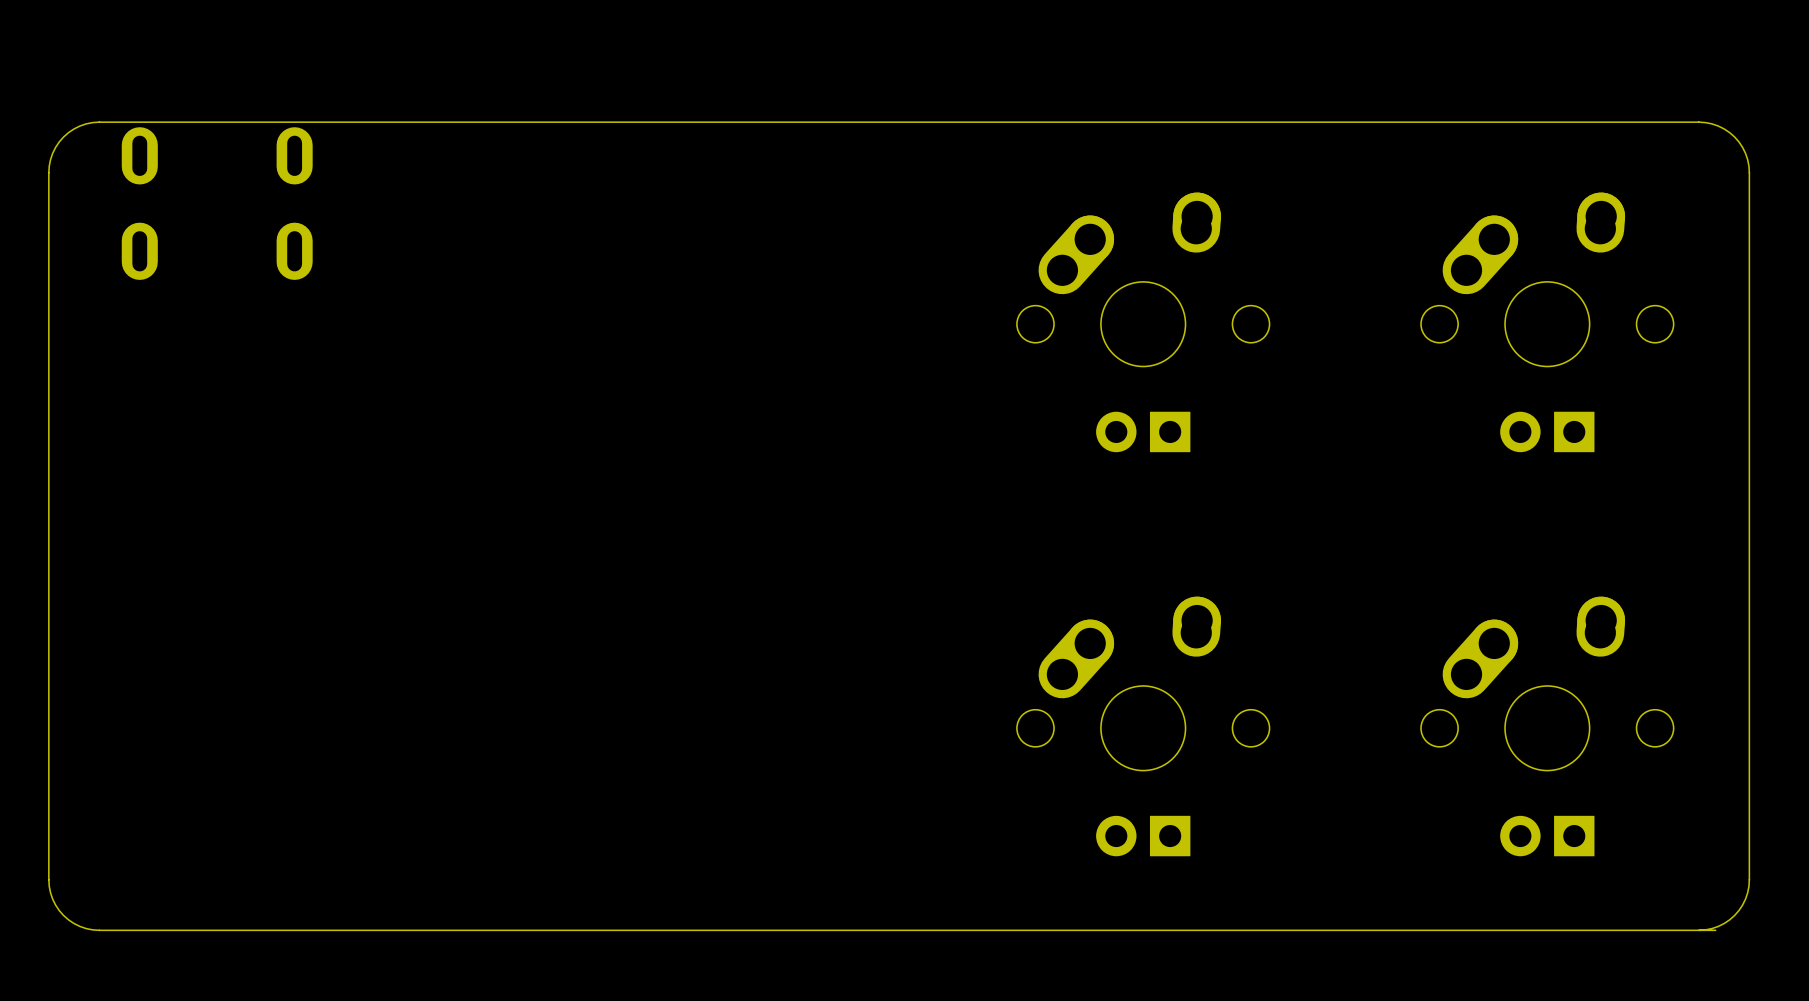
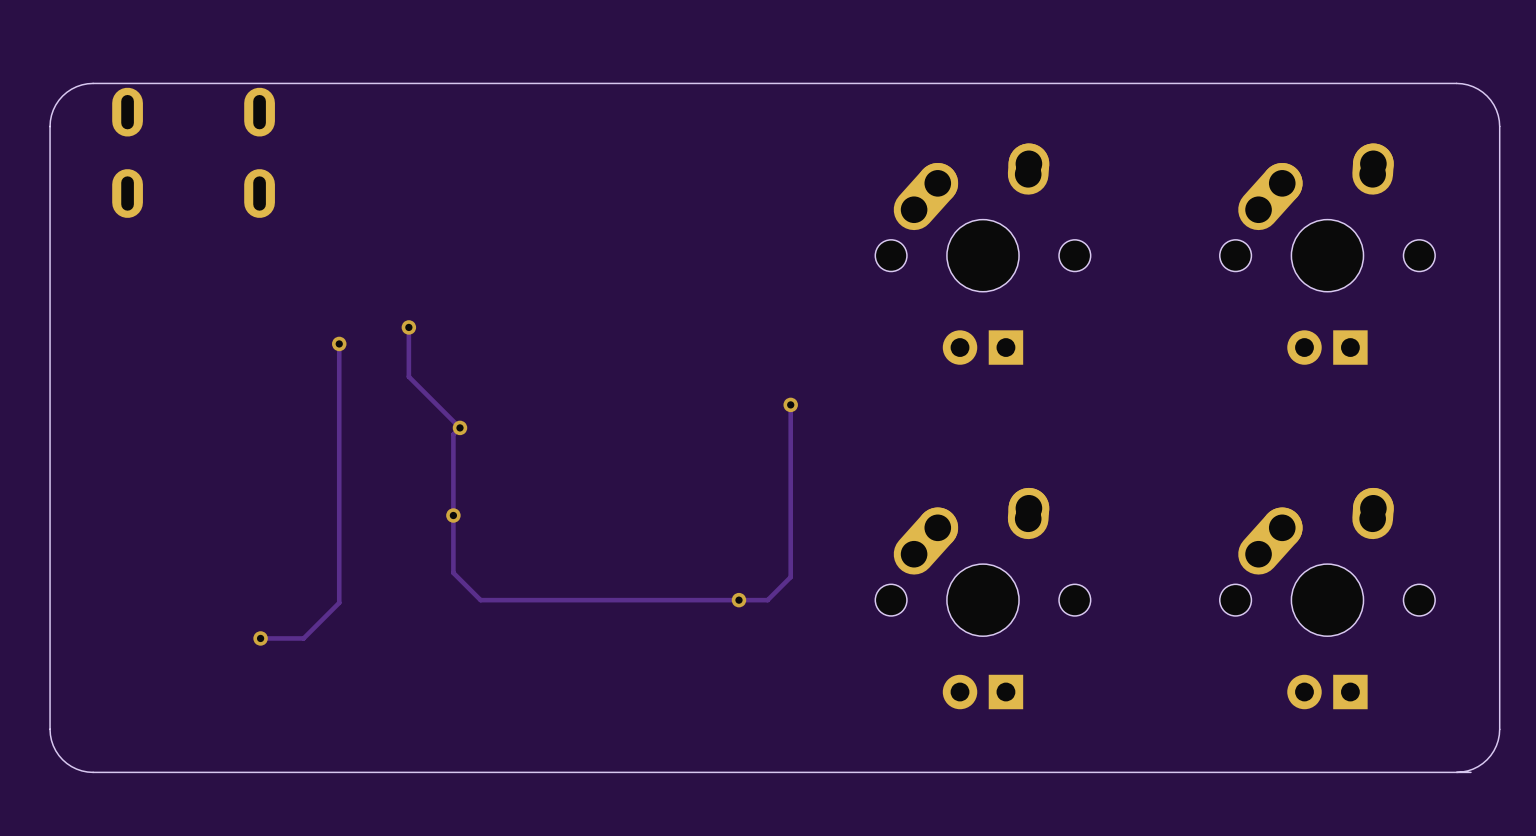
track: none -> (408, 327) (408, 376) (459, 427) (453, 434) (453, 572) (480, 600) (767, 600) (790, 577) (790, 404)
via: none -> (408, 327)
track: none -> (339, 343) (339, 602) (303, 638) (260, 638)
via: none -> (339, 343)
via: none -> (790, 404)
via: none -> (459, 427)
via: none -> (453, 515)
via: none -> (738, 600)
via: none -> (260, 638)

